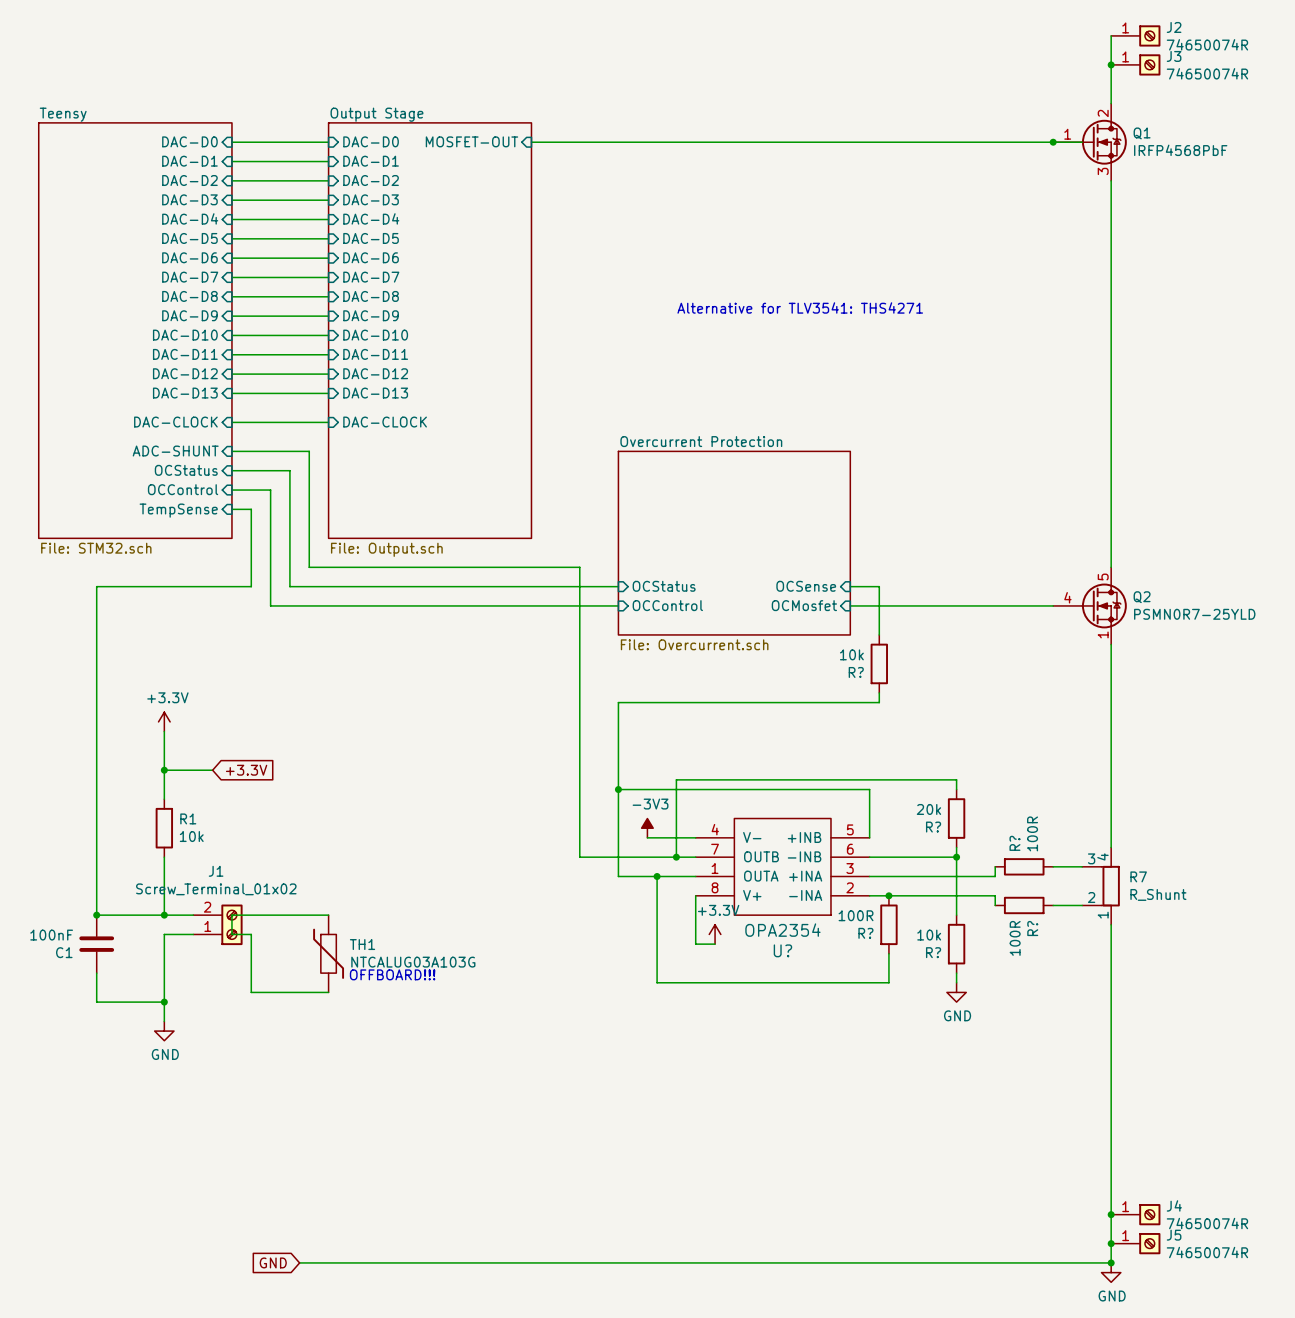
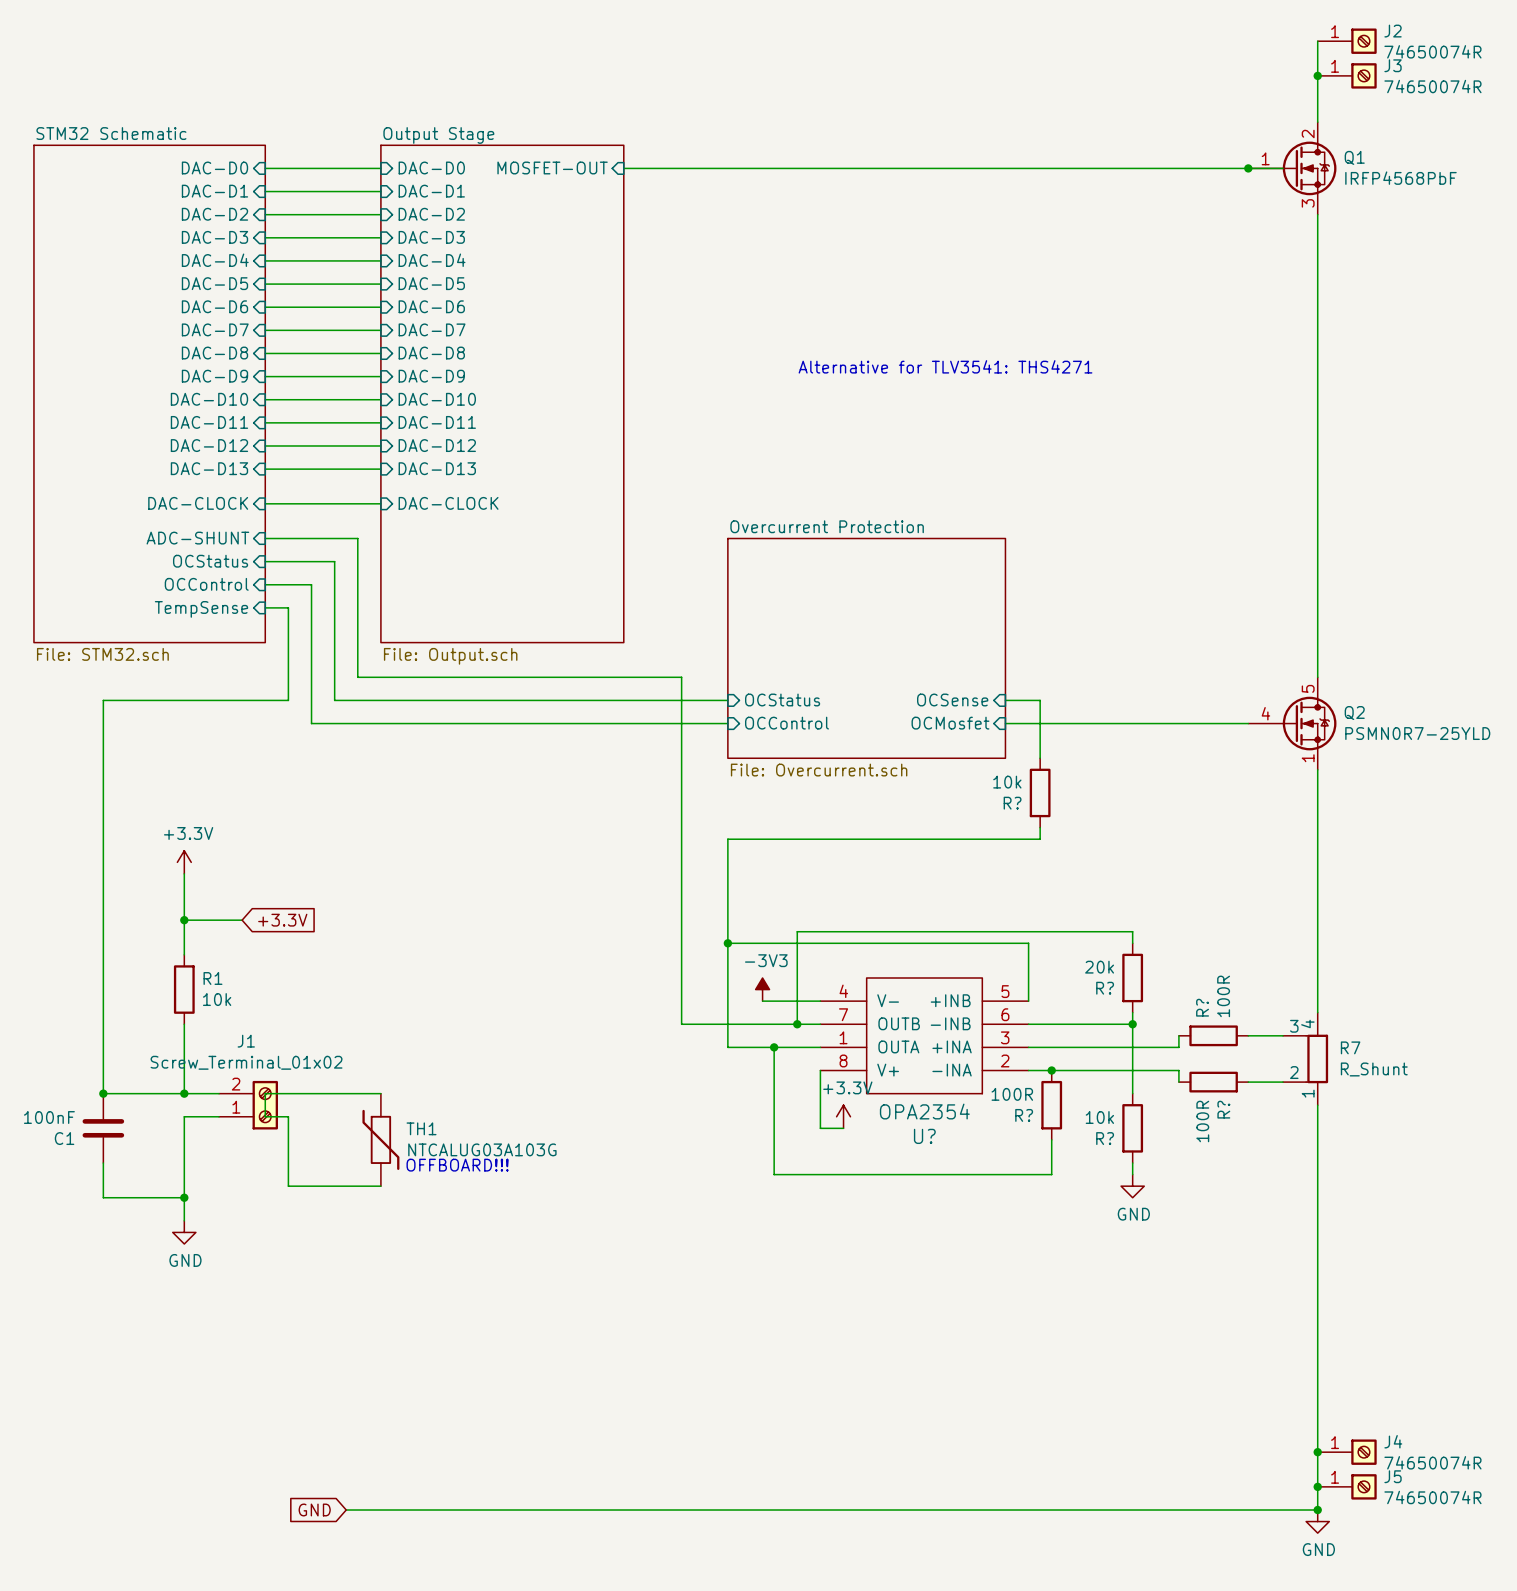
sheet Teensy name: Teensy (63, 114) -> STM32 Schematic (111, 133)

